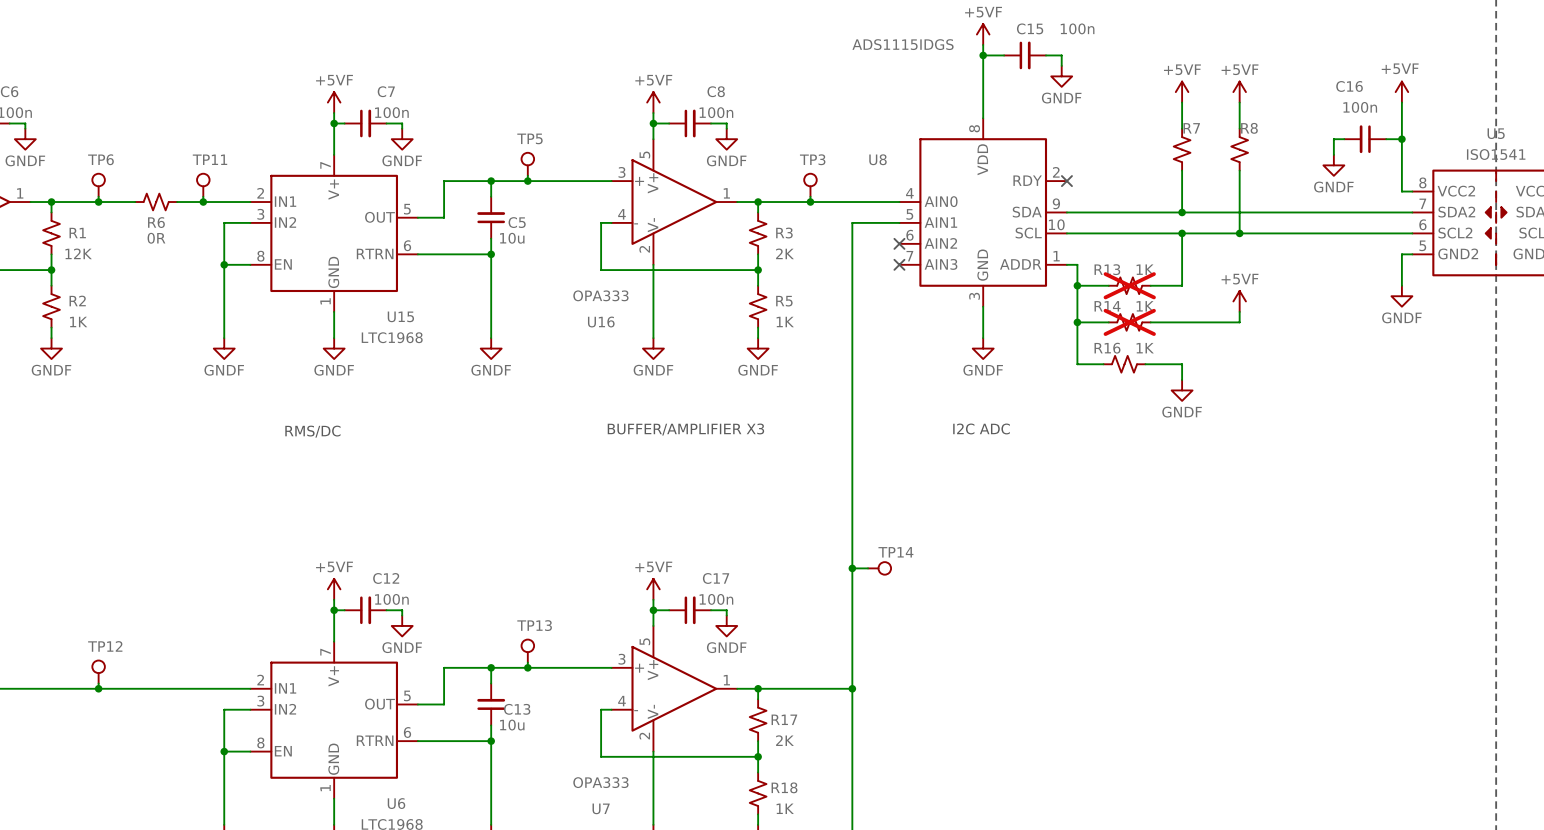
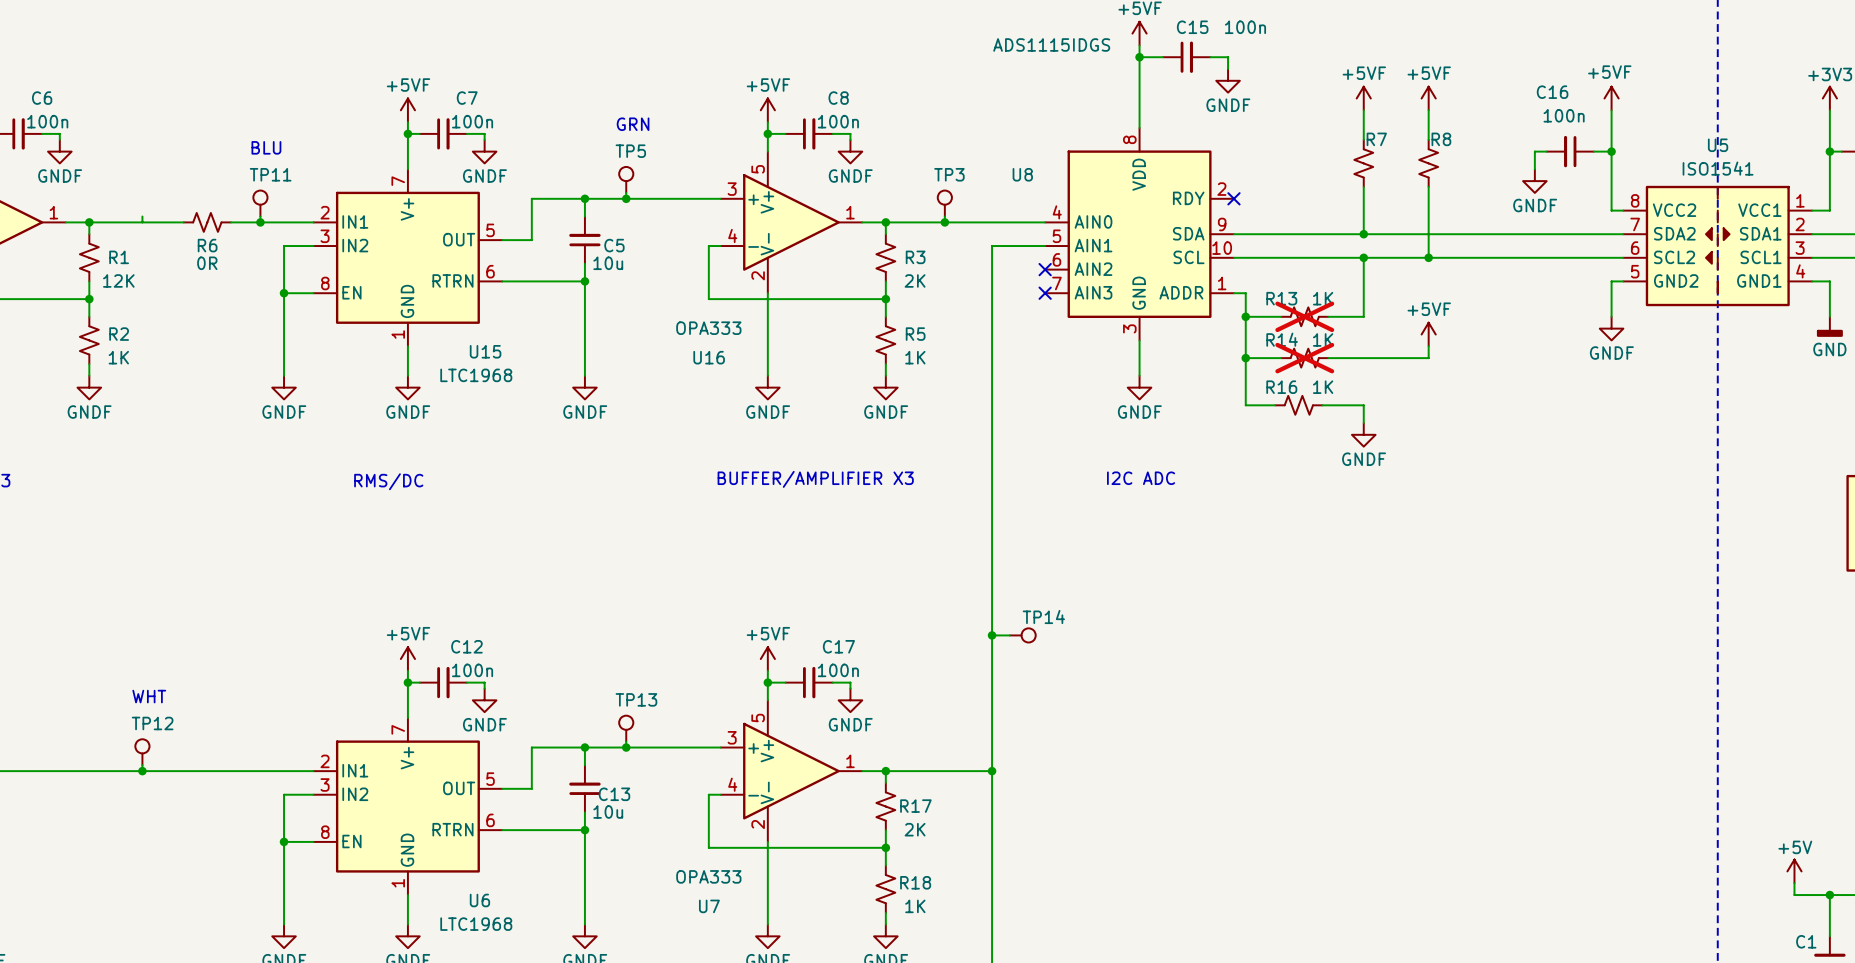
text: none -> GRN (633, 124)
text: none -> BLU (266, 147)
TP6: (98, 185) -> none
junction: (98, 202) -> none
text: none -> WHT (149, 696)

